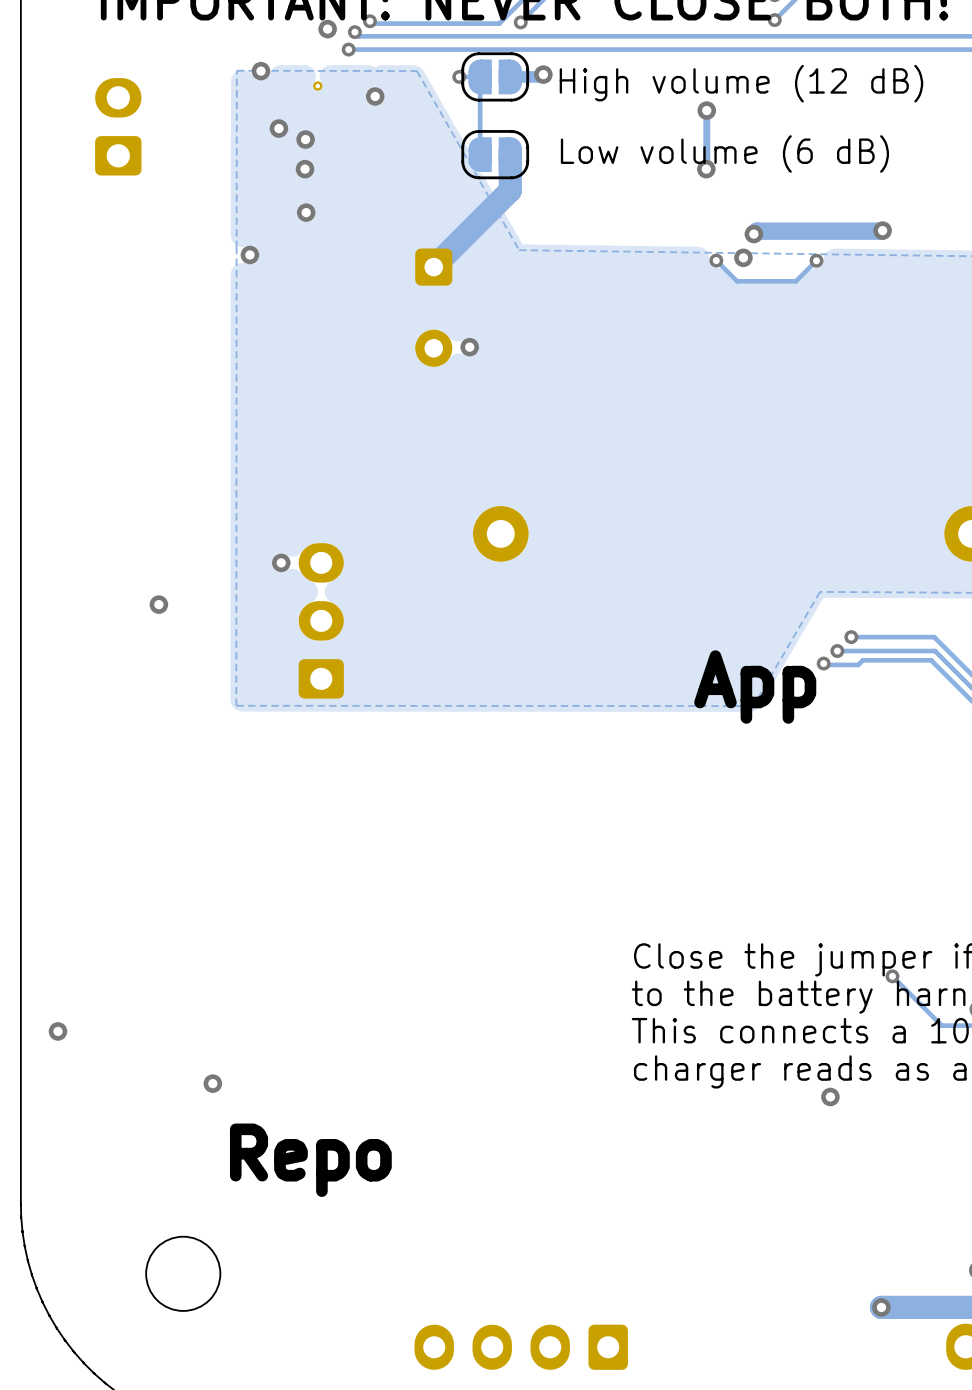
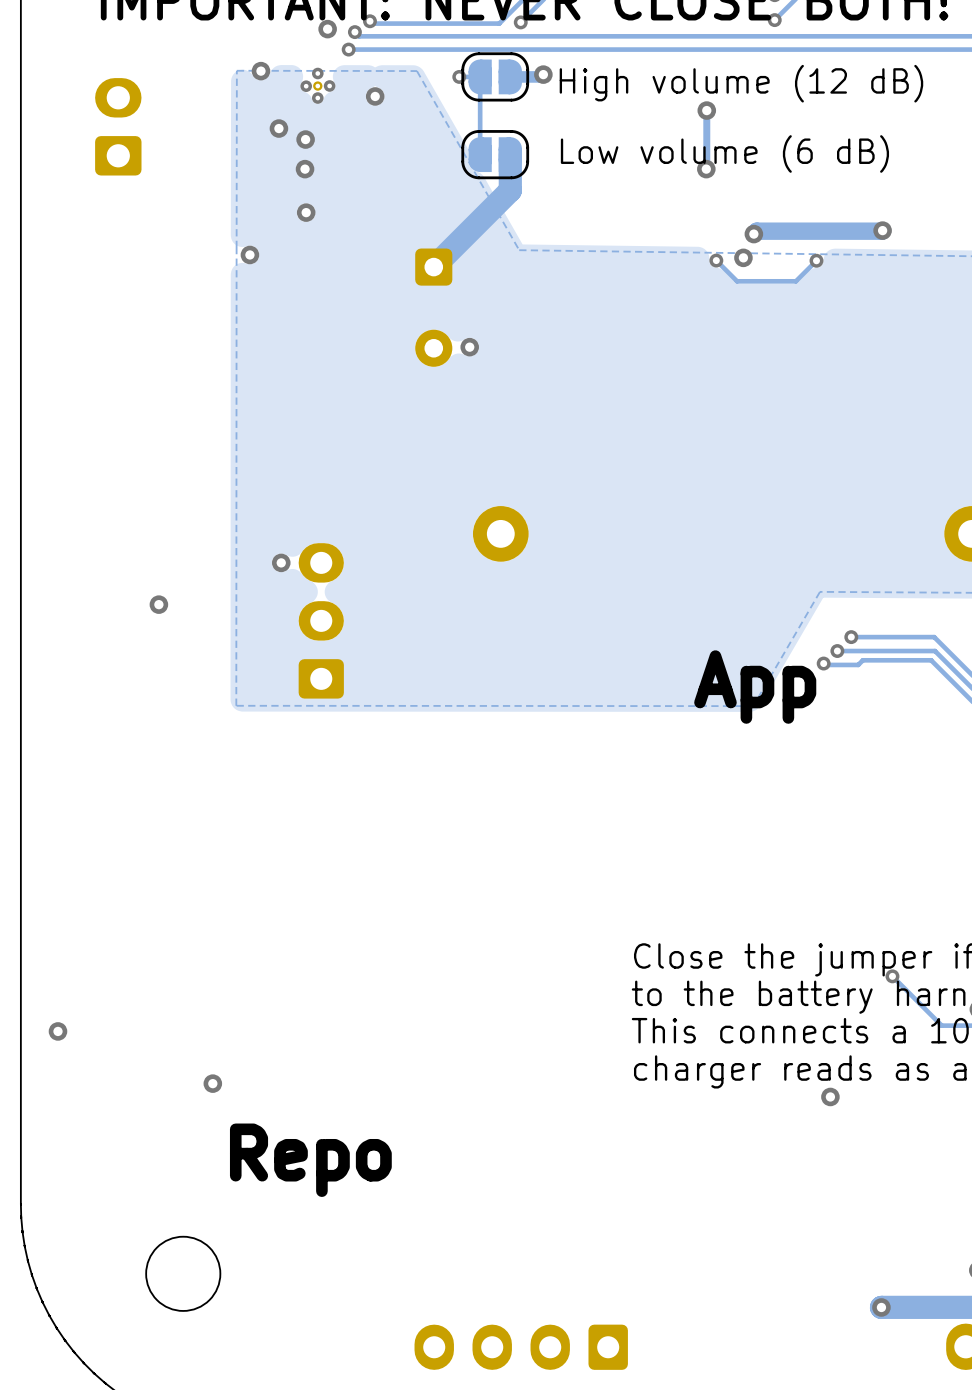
via: none -> (317, 73)
via: none -> (329, 85)
via: none -> (306, 86)
via: none -> (317, 98)

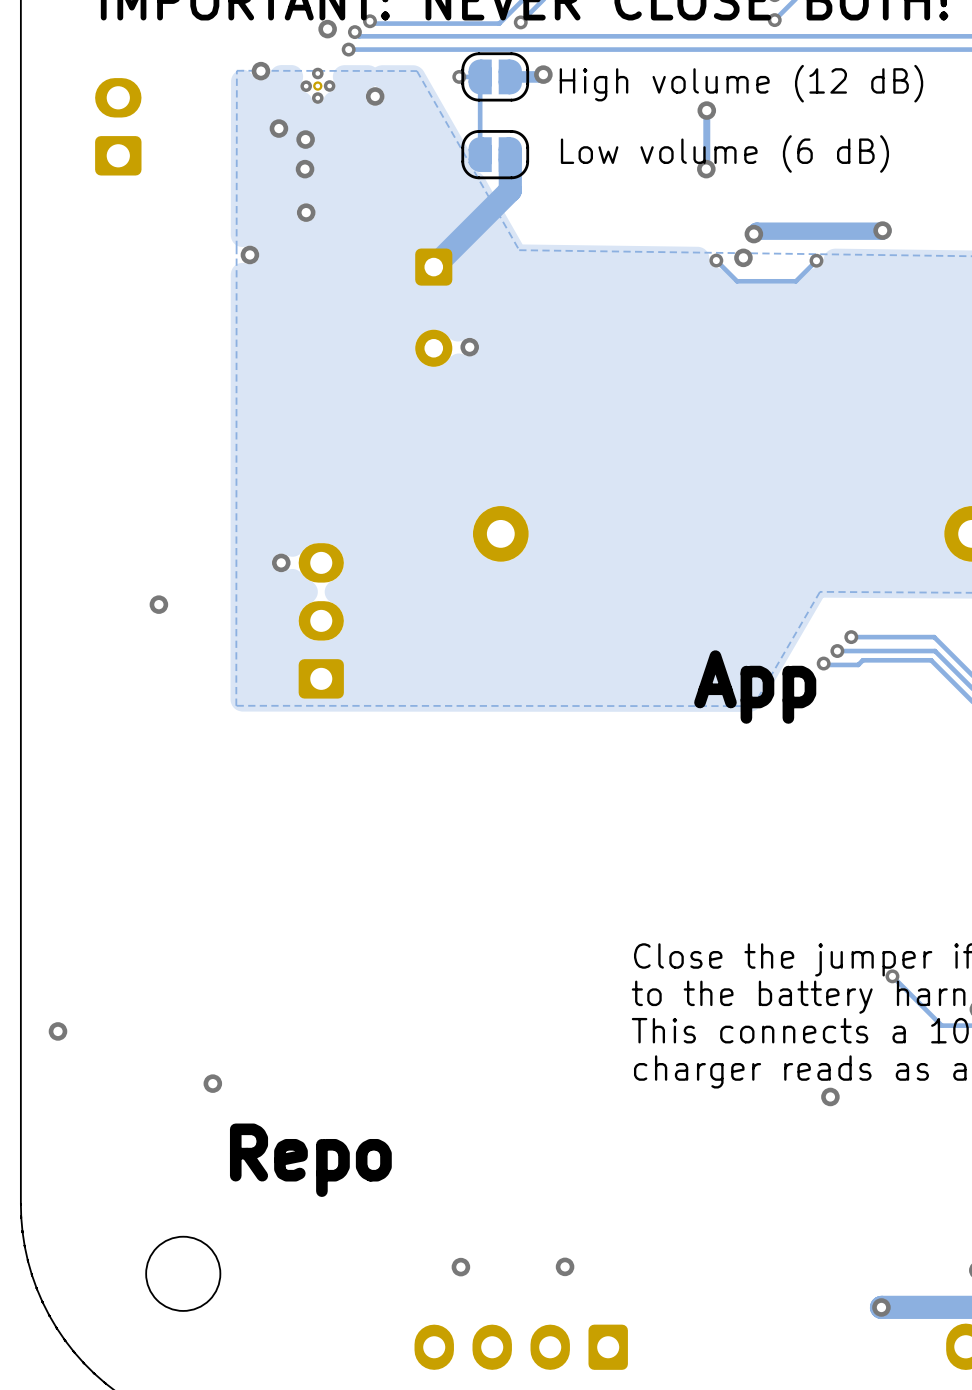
via: none -> (565, 1266)
via: none -> (460, 1267)

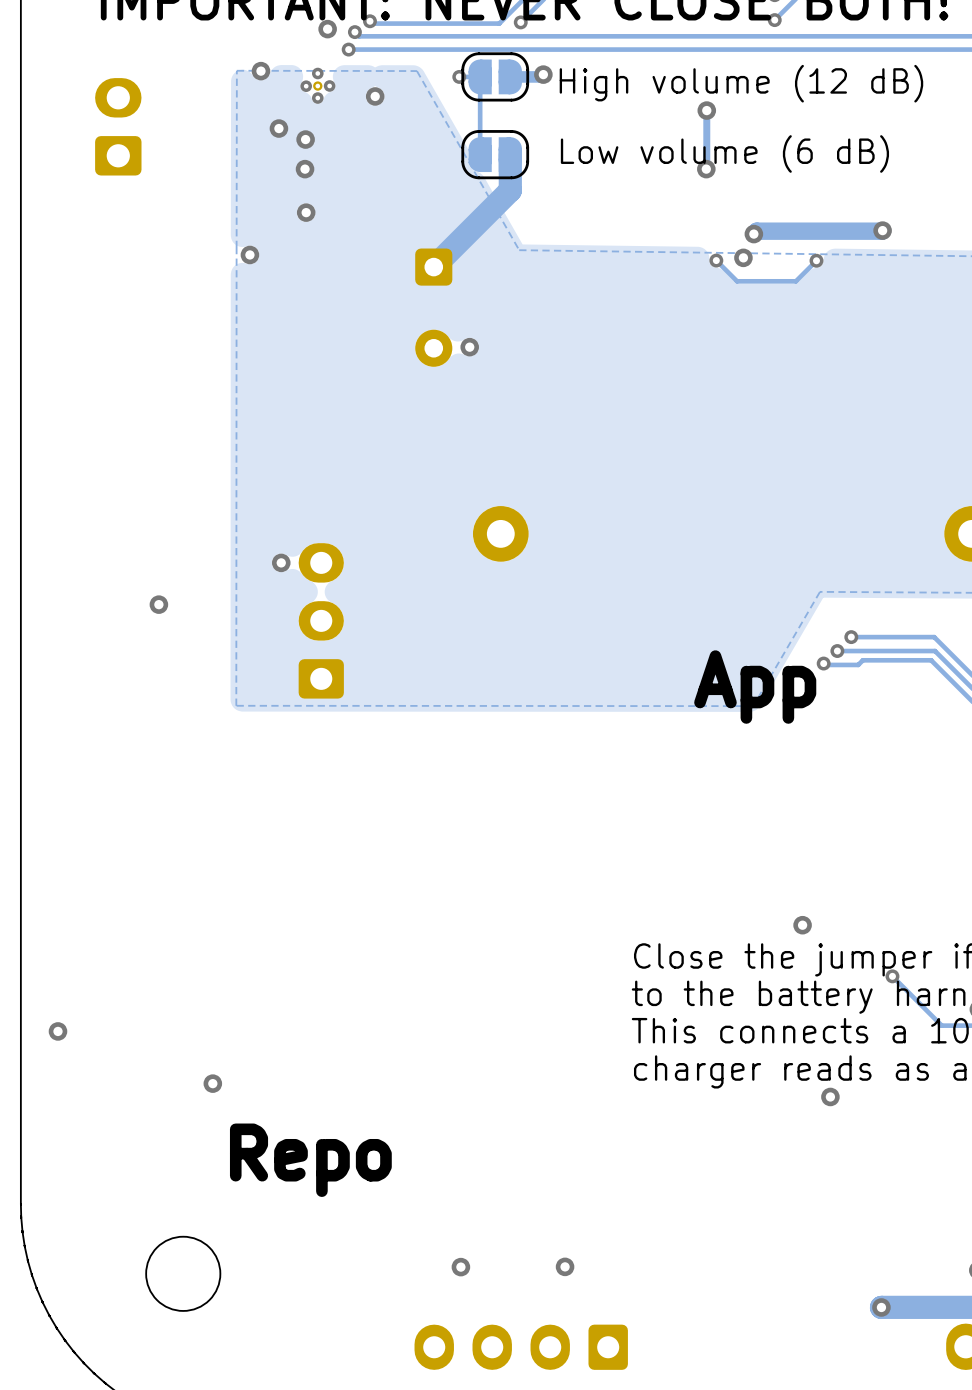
via: none -> (802, 925)

